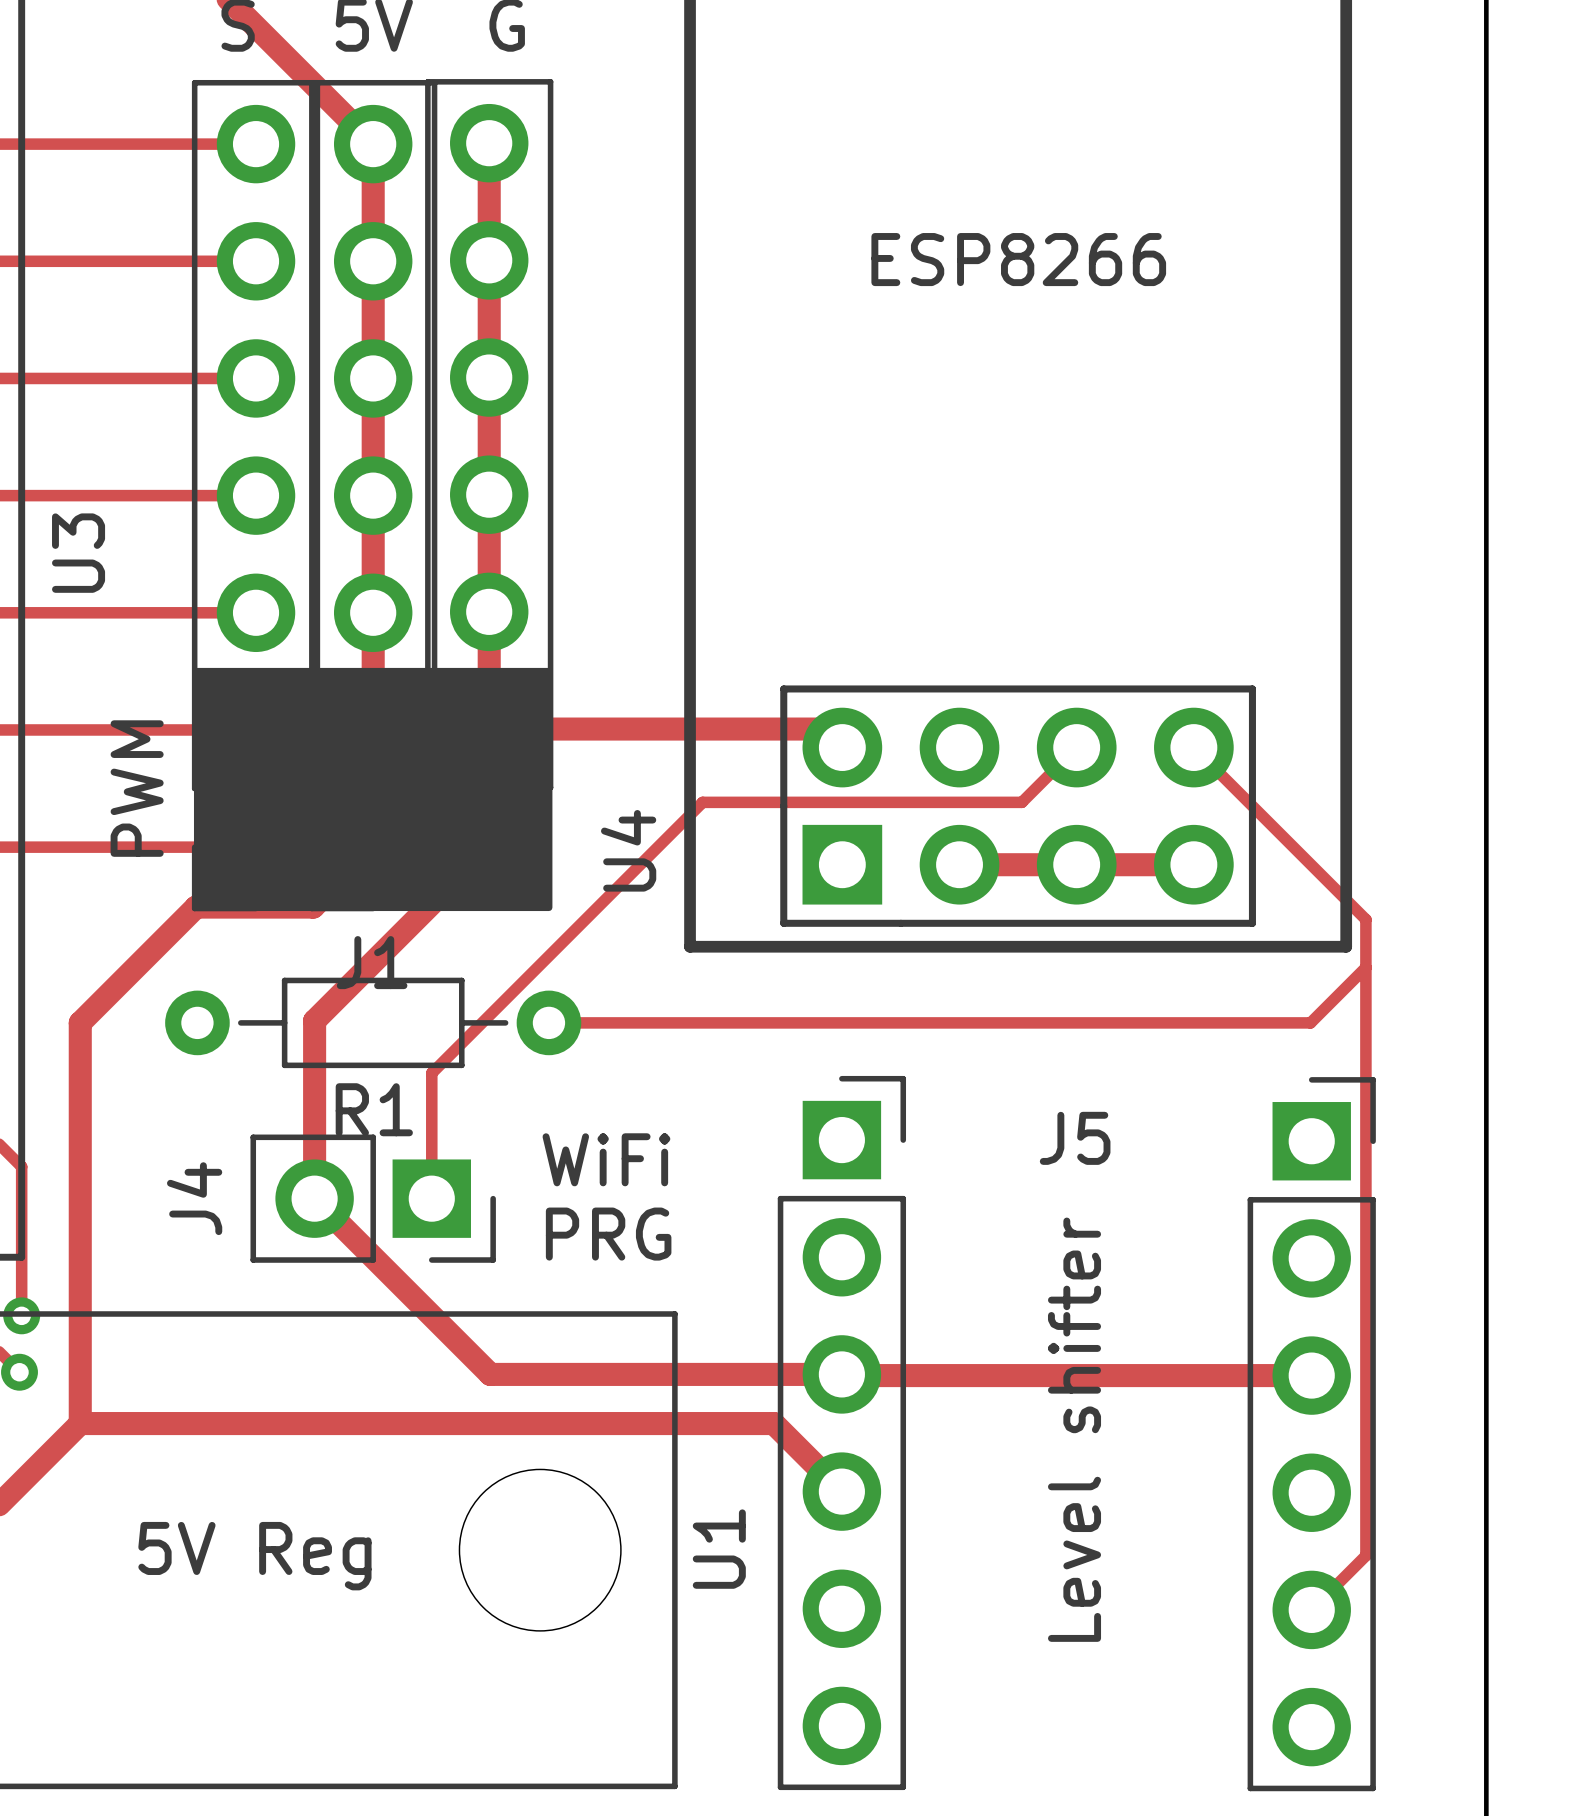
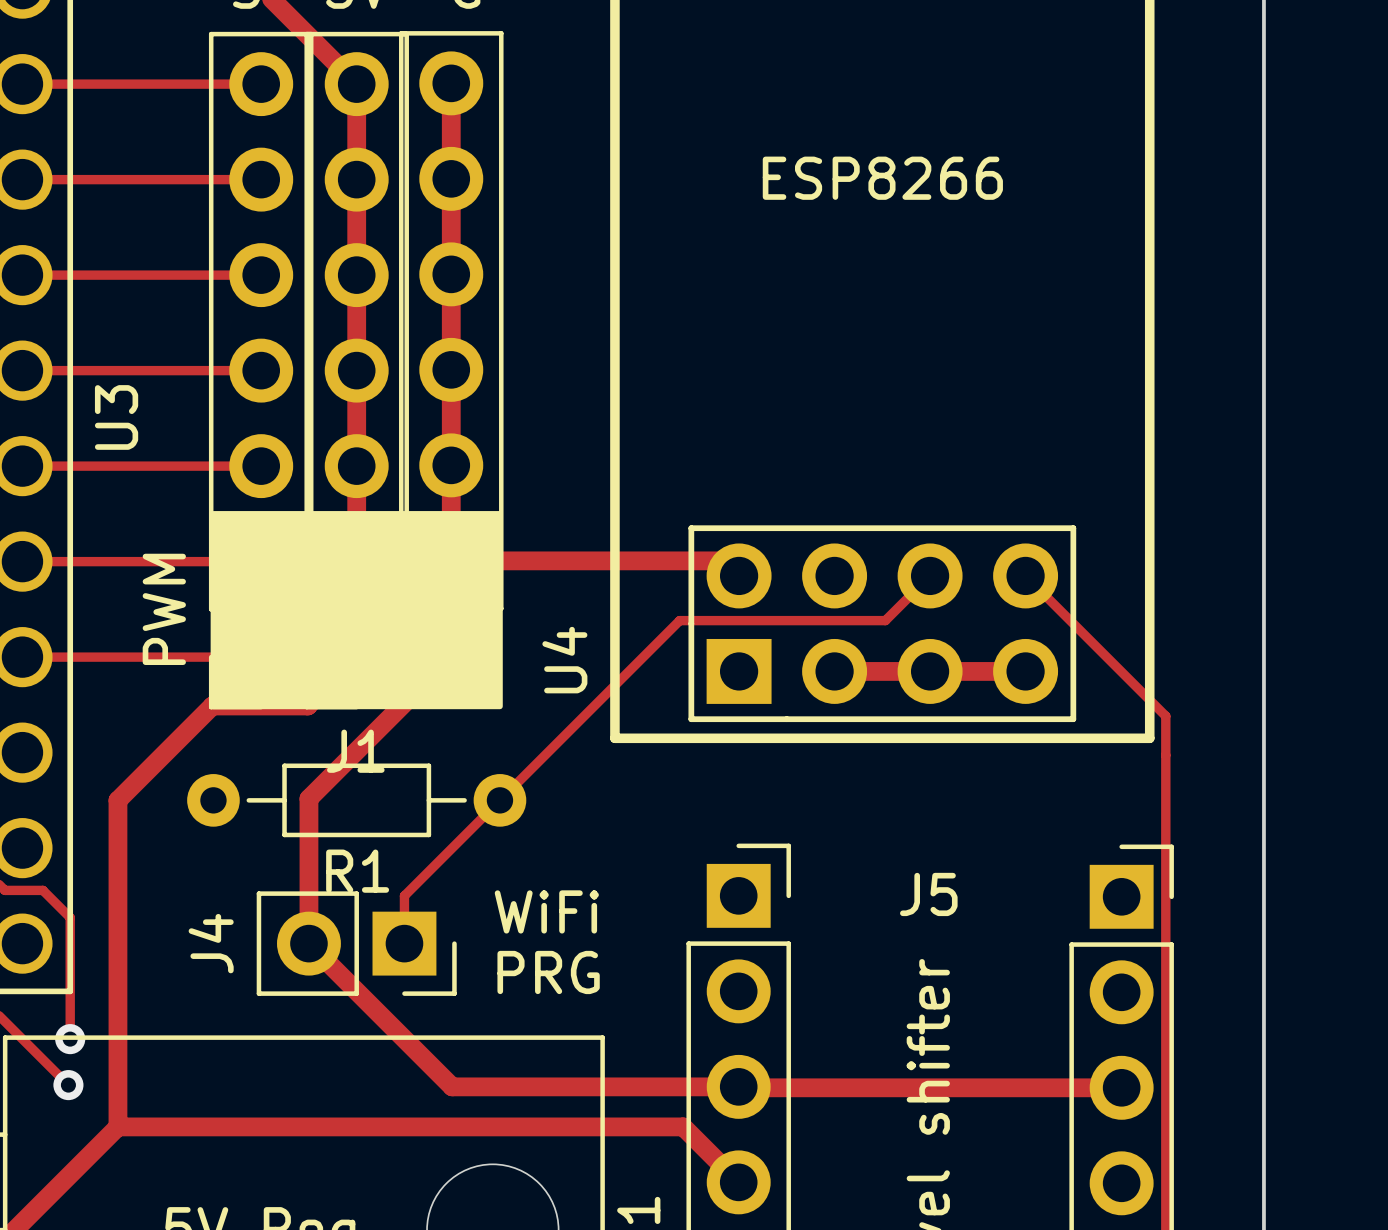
track: (769, 802) (702, 802) (431, 1073) (431, 1140) -> (679, 620) (404, 895)
track: (1365, 967) (1310, 1022) (548, 1022) -> none

